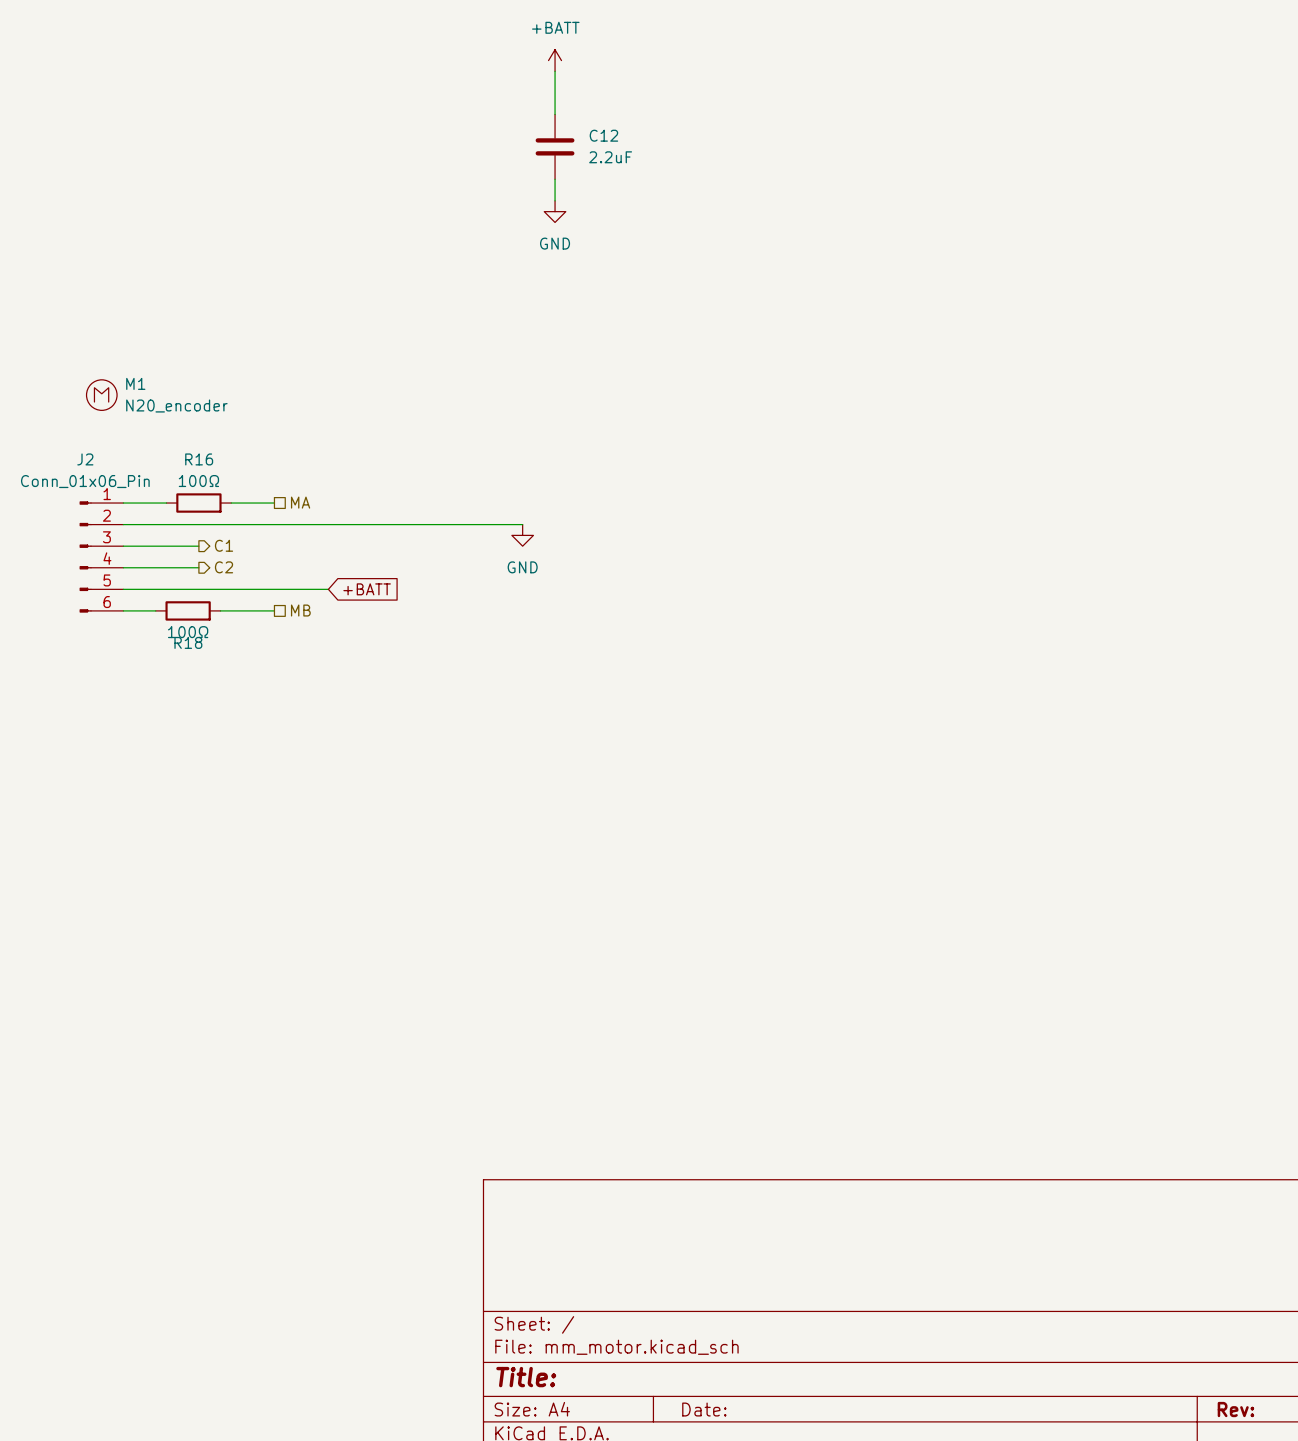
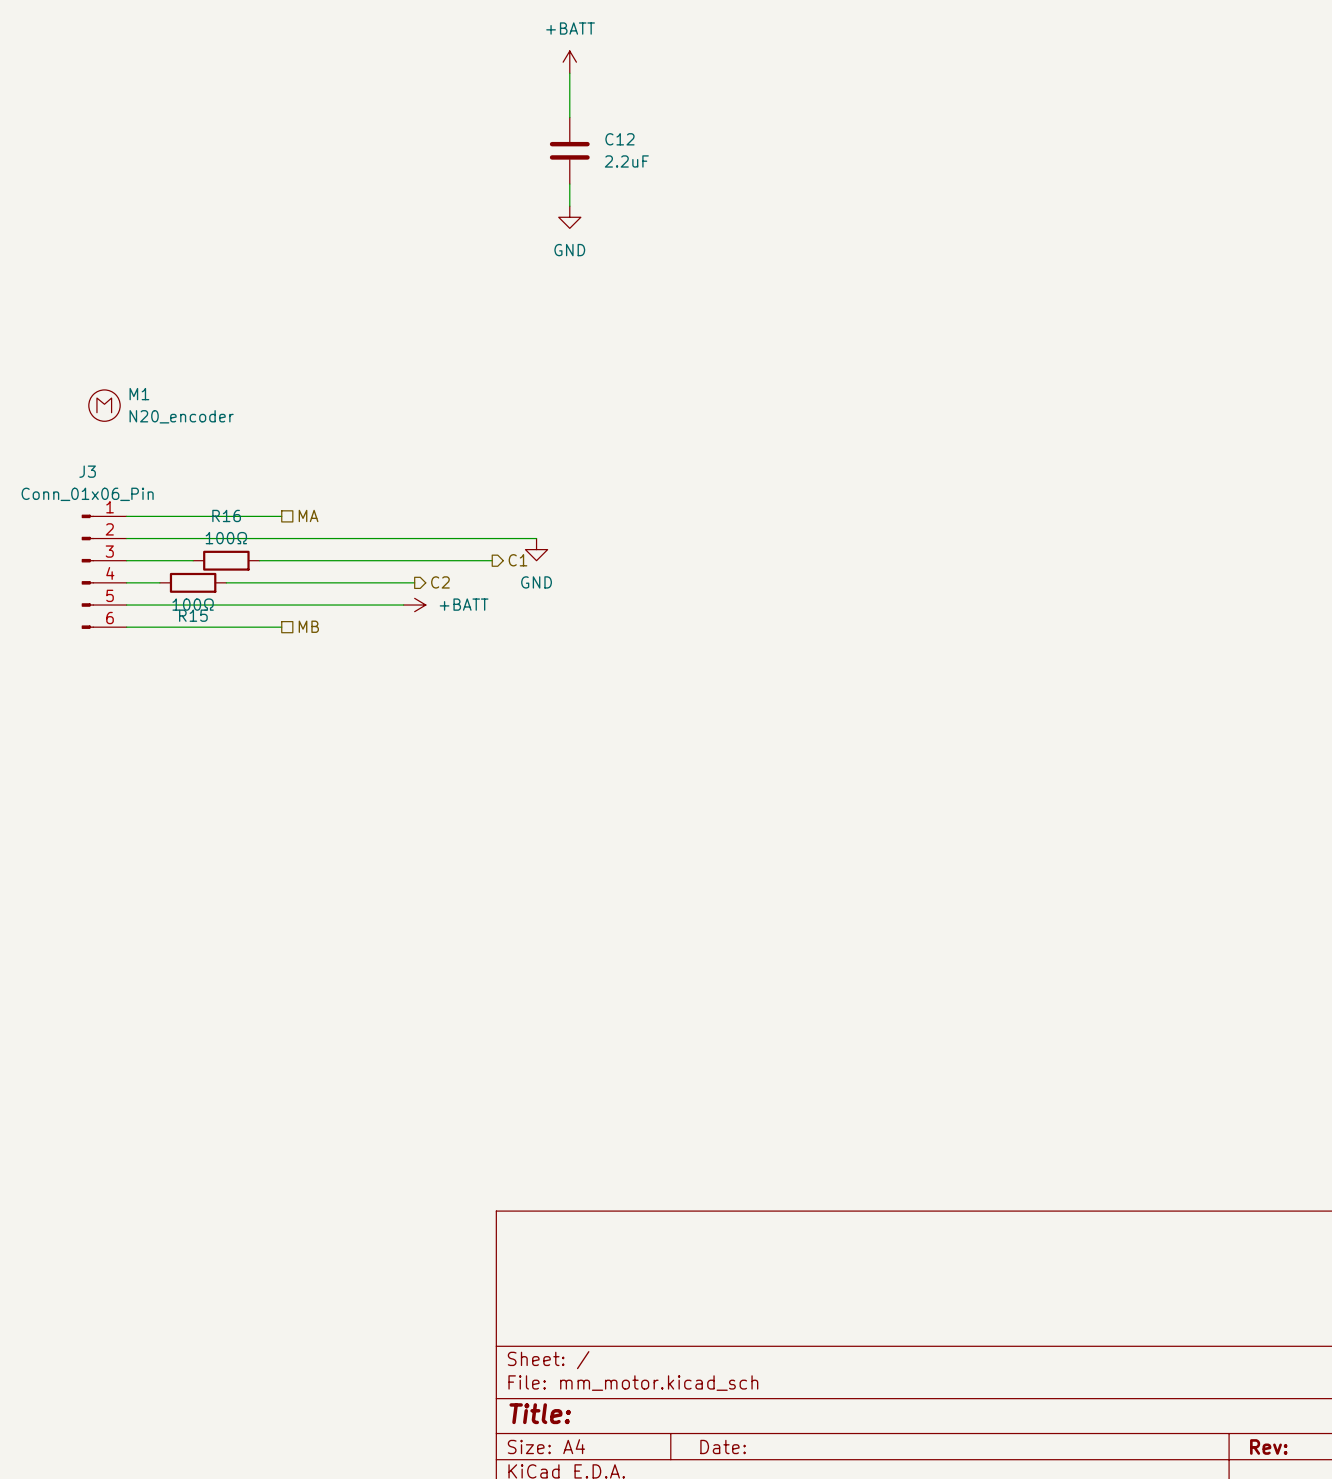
J2 name: J2 (85, 459) -> J3 (87, 471)
wire: none -> (170, 516) (237, 516)
R16 position: (198, 503) -> (226, 560)
hierarchical label: C1 (224, 545) -> none
hierarchical label: none -> C1 (517, 560)
wire: none -> (259, 560) (492, 560)
wire: (155, 567) (198, 567) -> none
R15: none -> 100Ω (193, 582)
wire: none -> (226, 582) (414, 582)
hierarchical label position: C2 (224, 567) -> C2 (440, 582)
wire: none -> (337, 605) (403, 605)
global label: +BATT (367, 589) -> none
power symbol: none -> +BATT (414, 605)
wire: none -> (159, 627) (226, 627)
R18: 100Ω (188, 610) -> none

